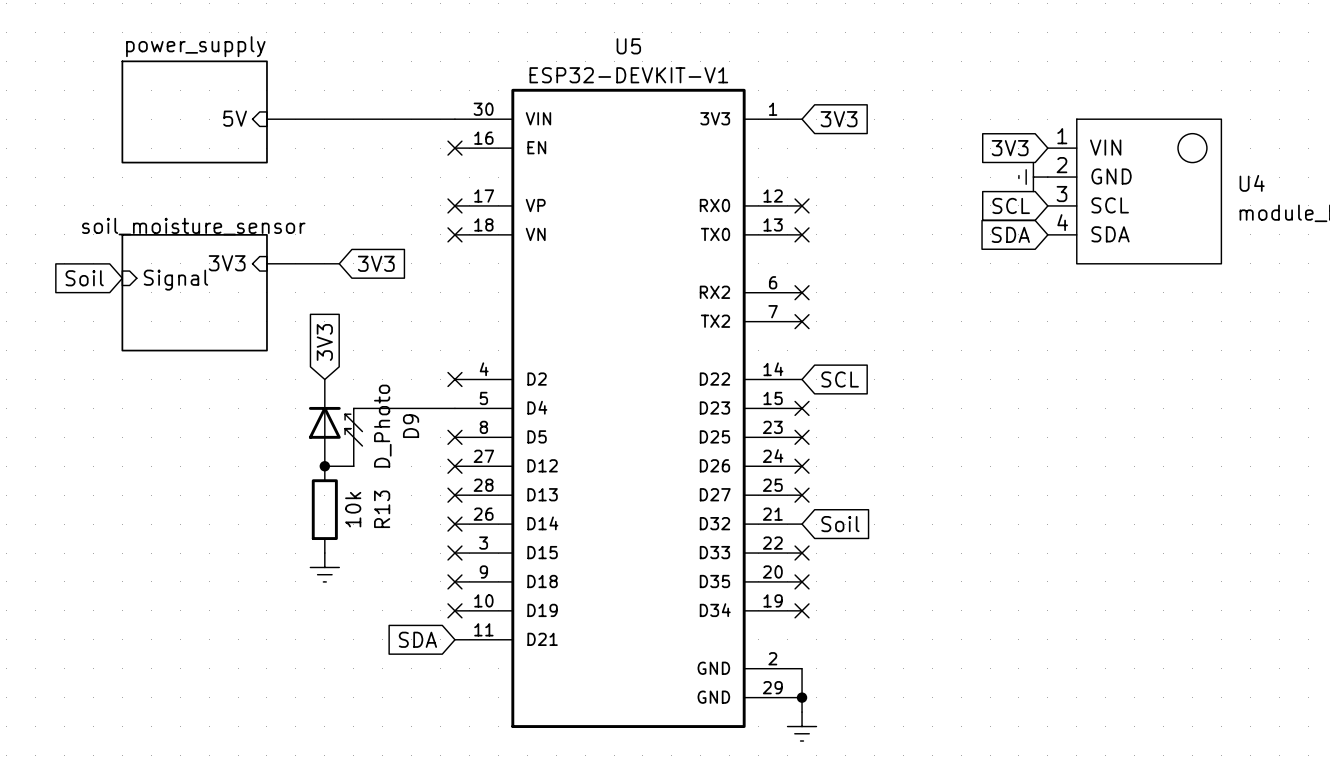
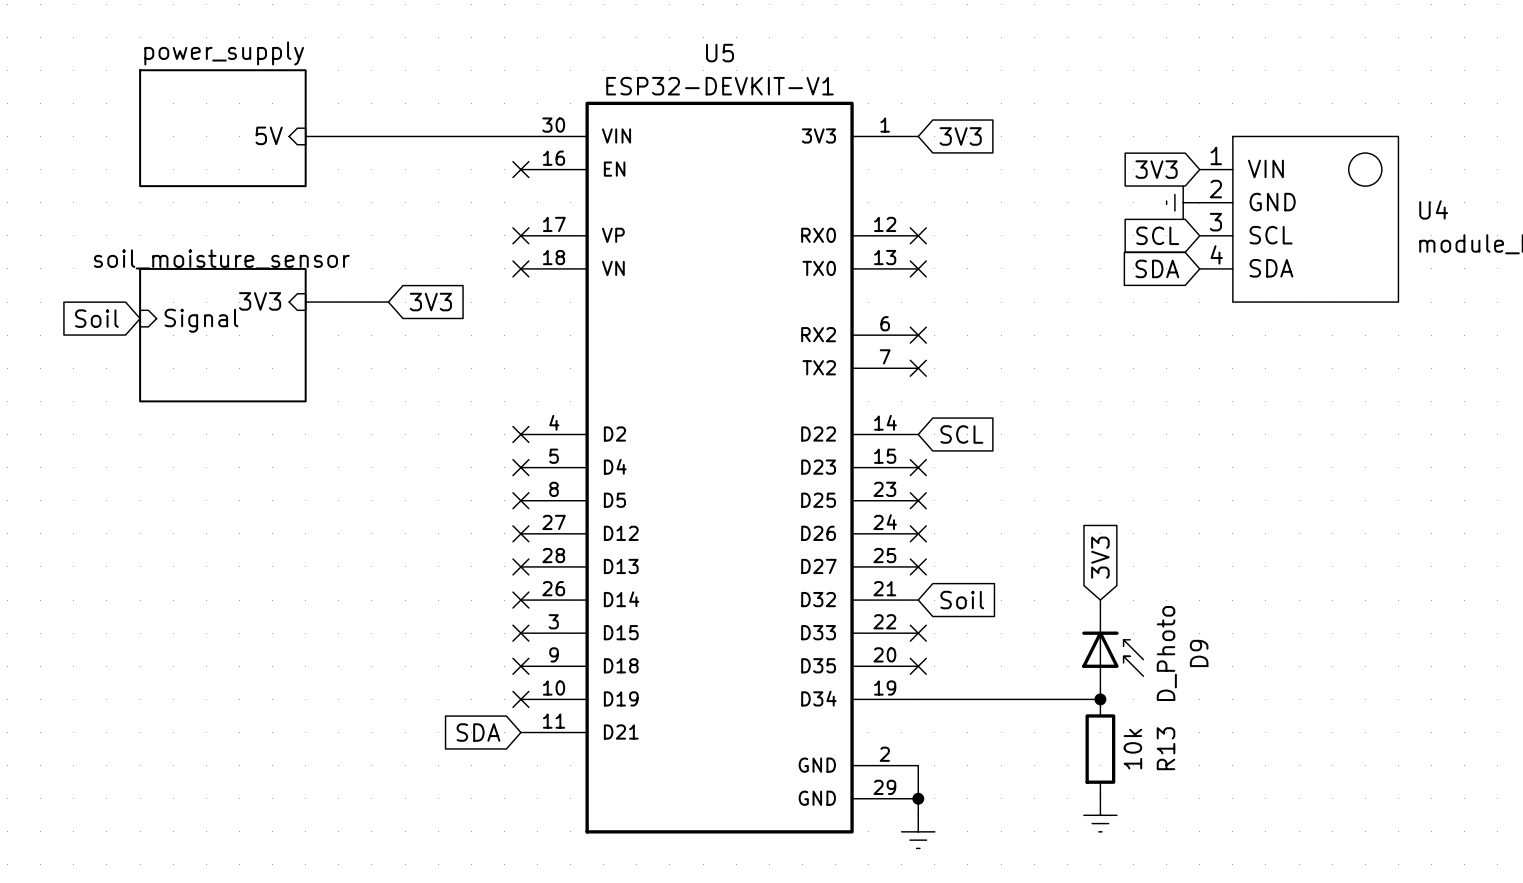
global label: 3V3 (324, 342) -> none
wire: (454, 408) (353, 408) (353, 466) (324, 466) -> none
no-connect mark: none -> (520, 467)
D9 position: (335, 422) -> (1112, 649)
junction: (324, 466) -> none
global label: none -> 3V3 (1100, 557)
R13 position: (324, 509) -> (1100, 749)
power symbol: (324, 567) -> none
wire: none -> (918, 699) (1100, 699)
no-connect mark: (802, 610) -> none
junction: none -> (1100, 699)
power symbol: none -> (1100, 815)

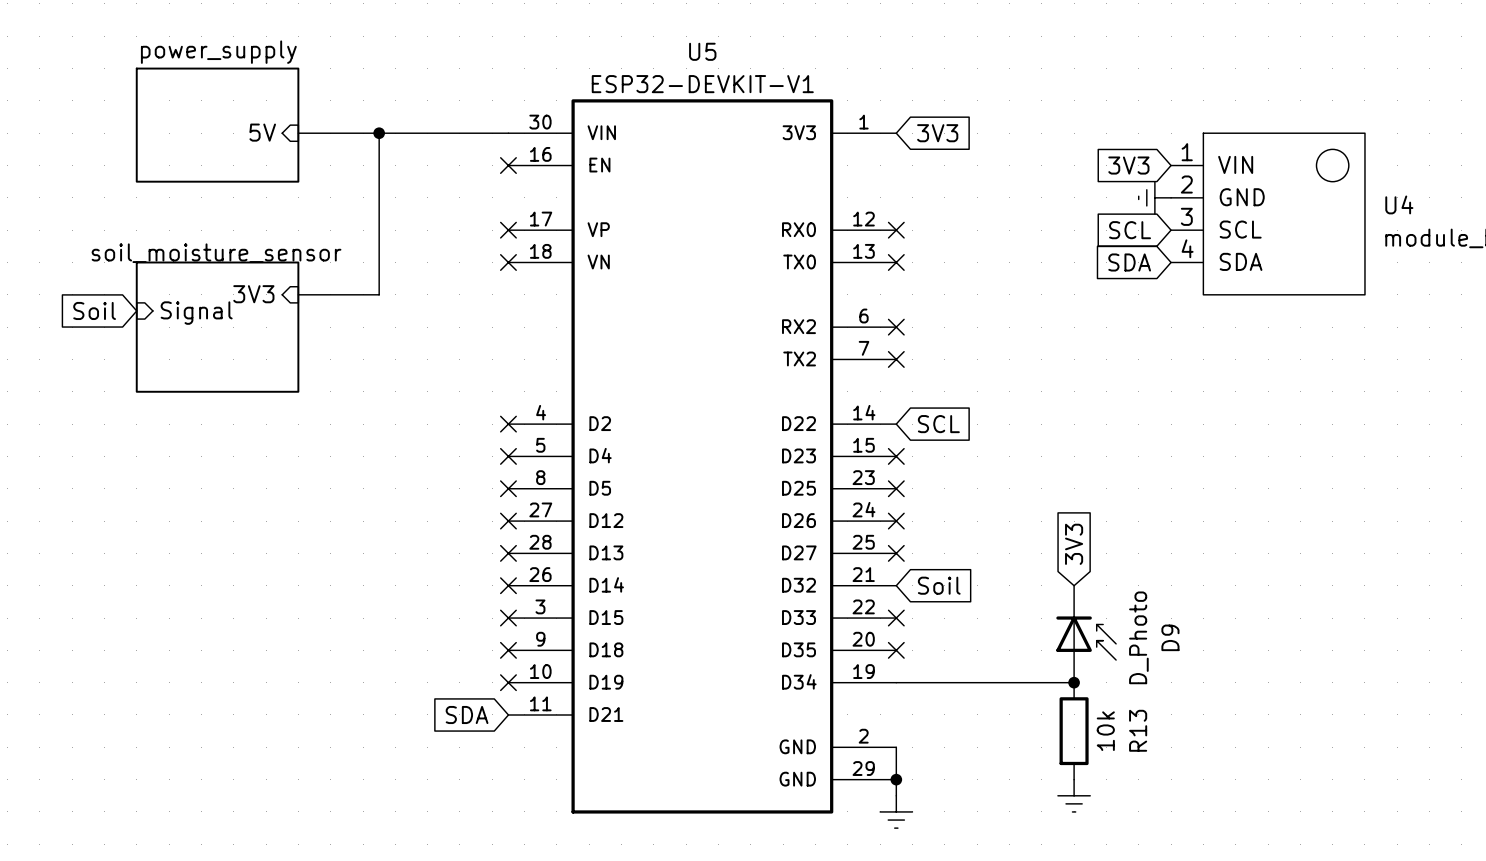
wire: none -> (379, 133) (379, 294)
junction: none -> (379, 133)
global label: 3V3 (430, 302) -> none

